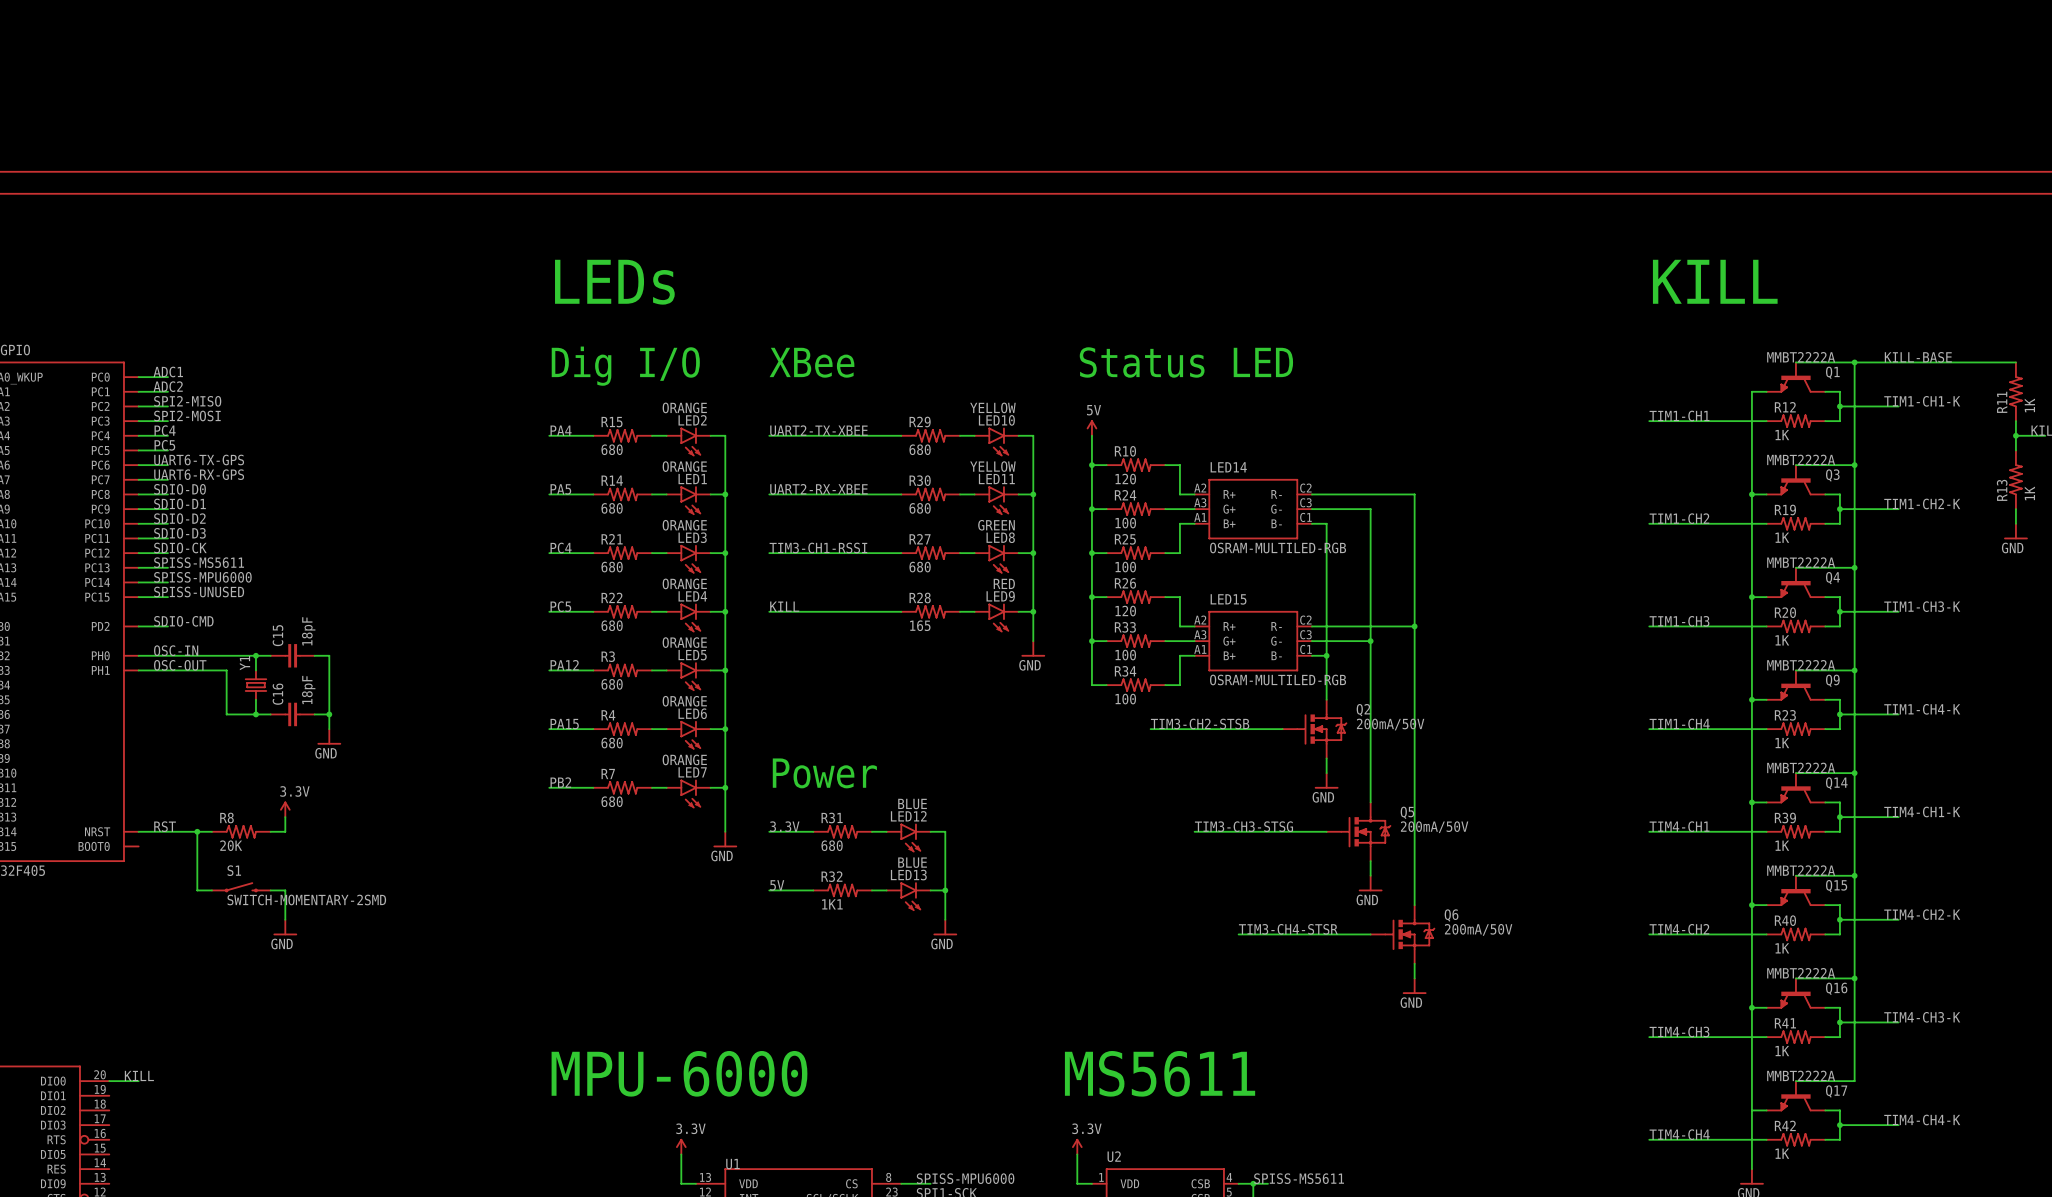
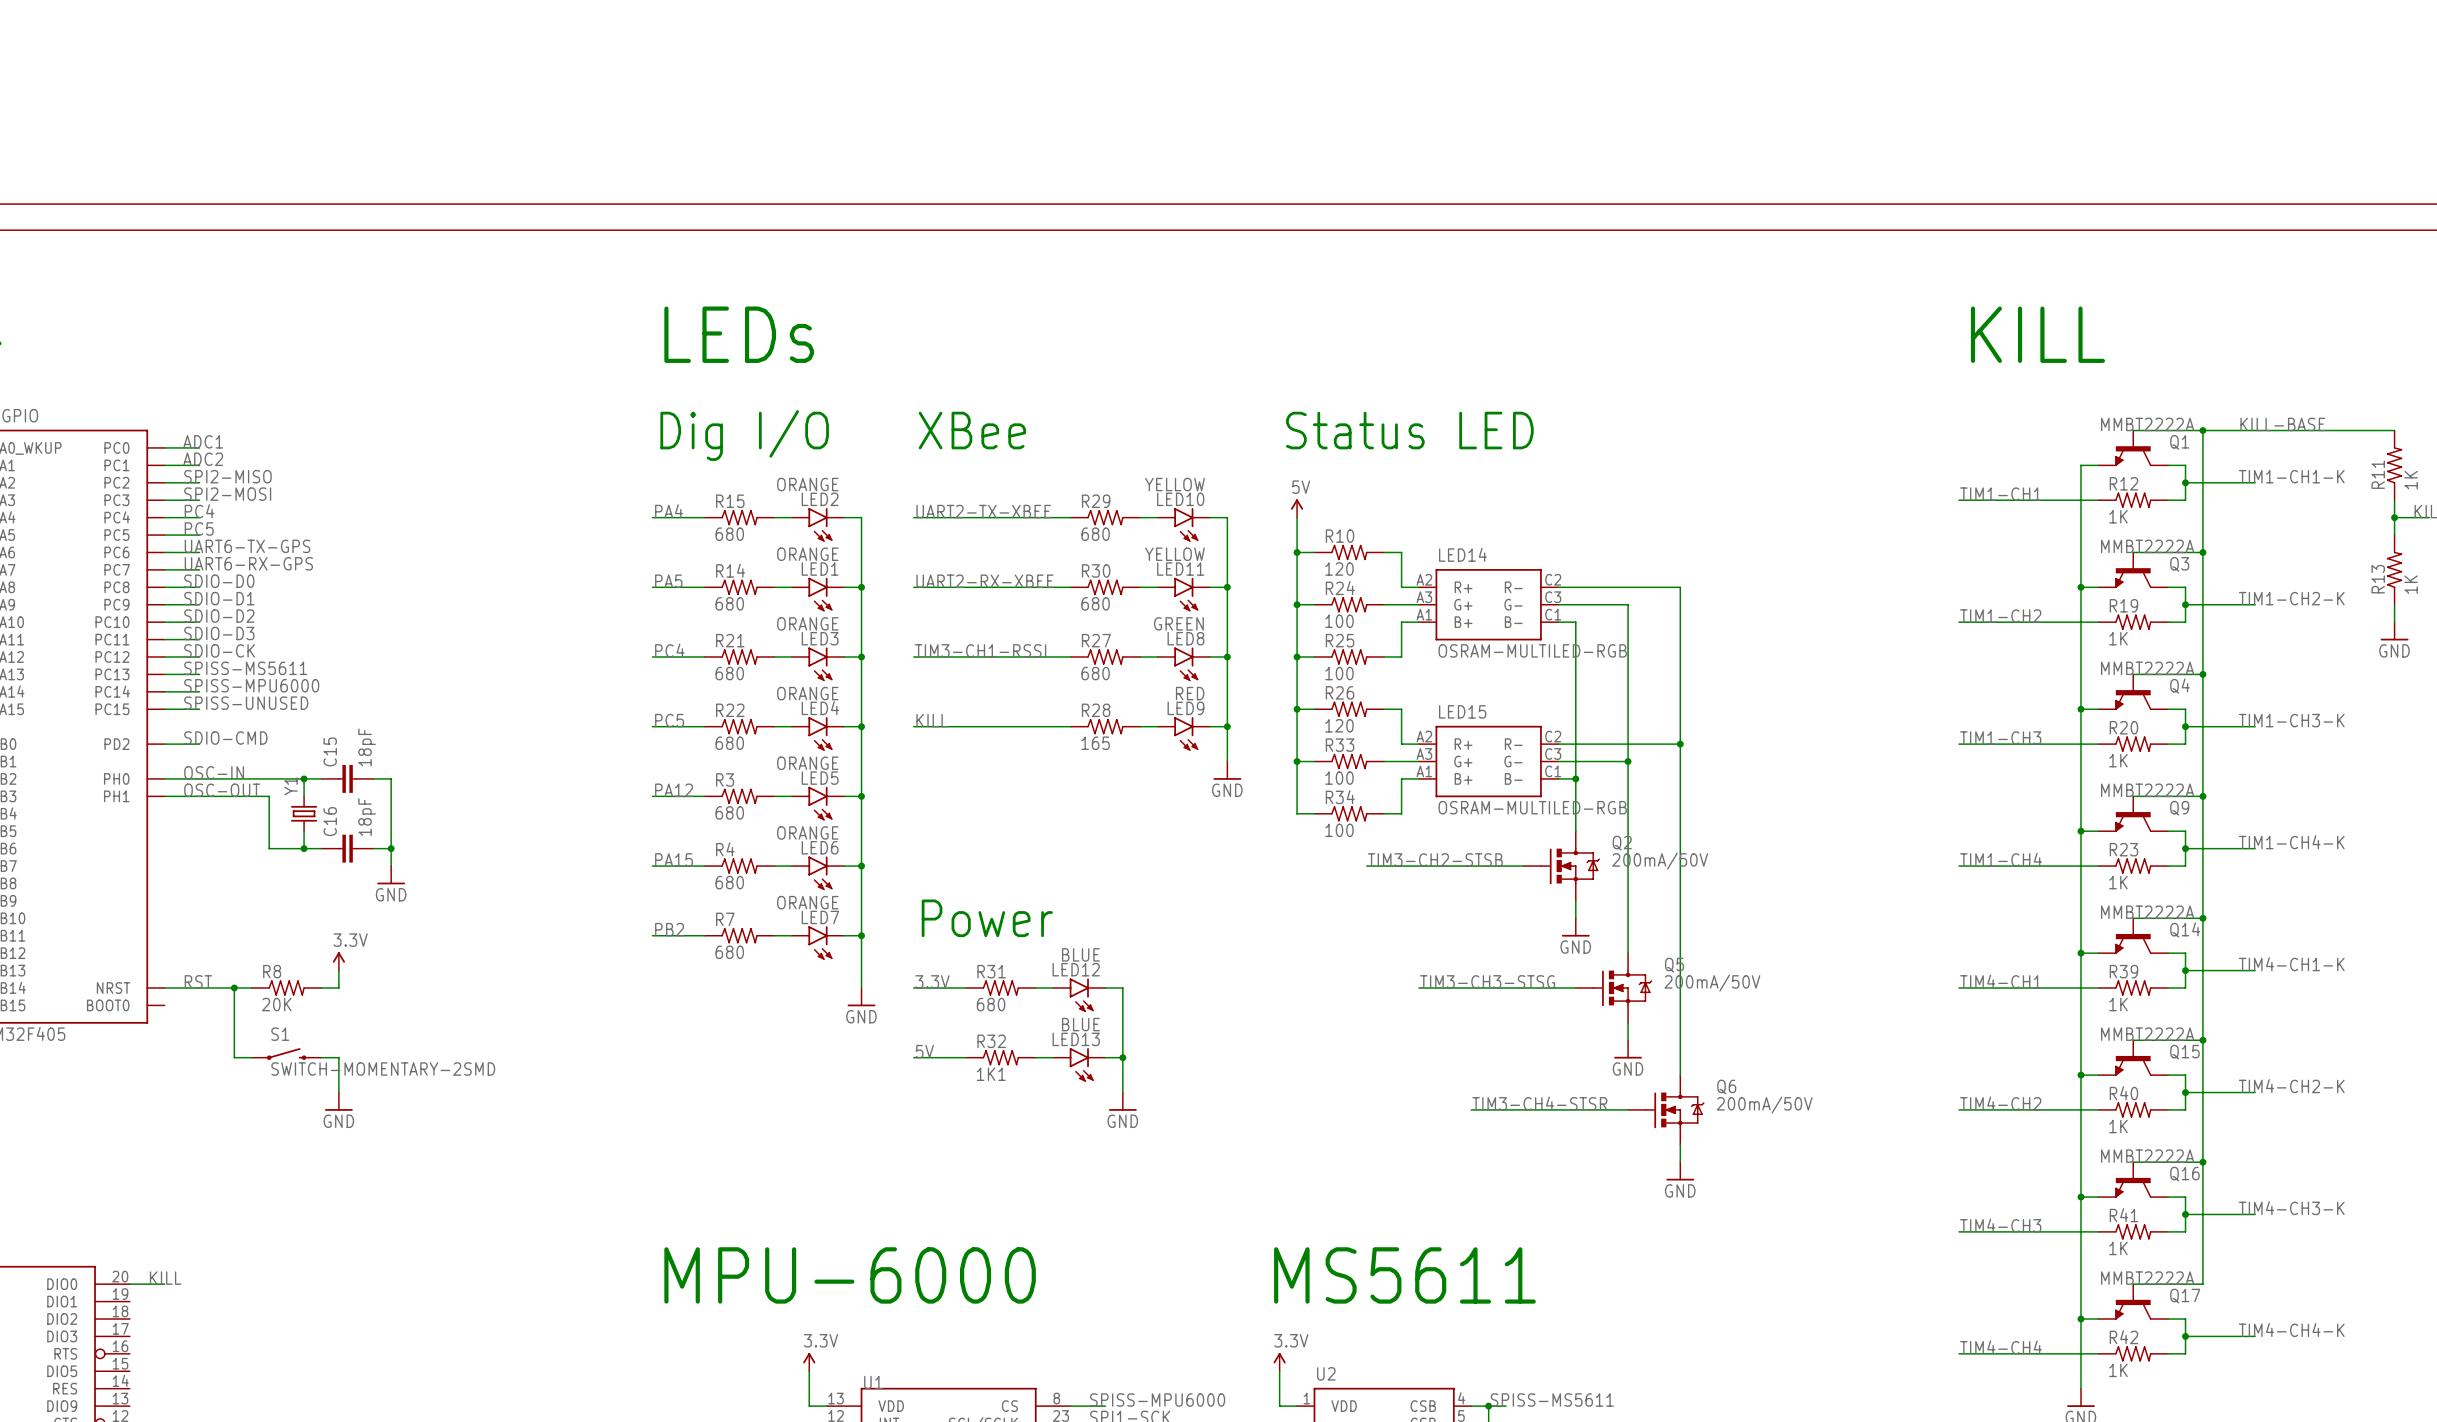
junction: none -> (2080, 1318)

